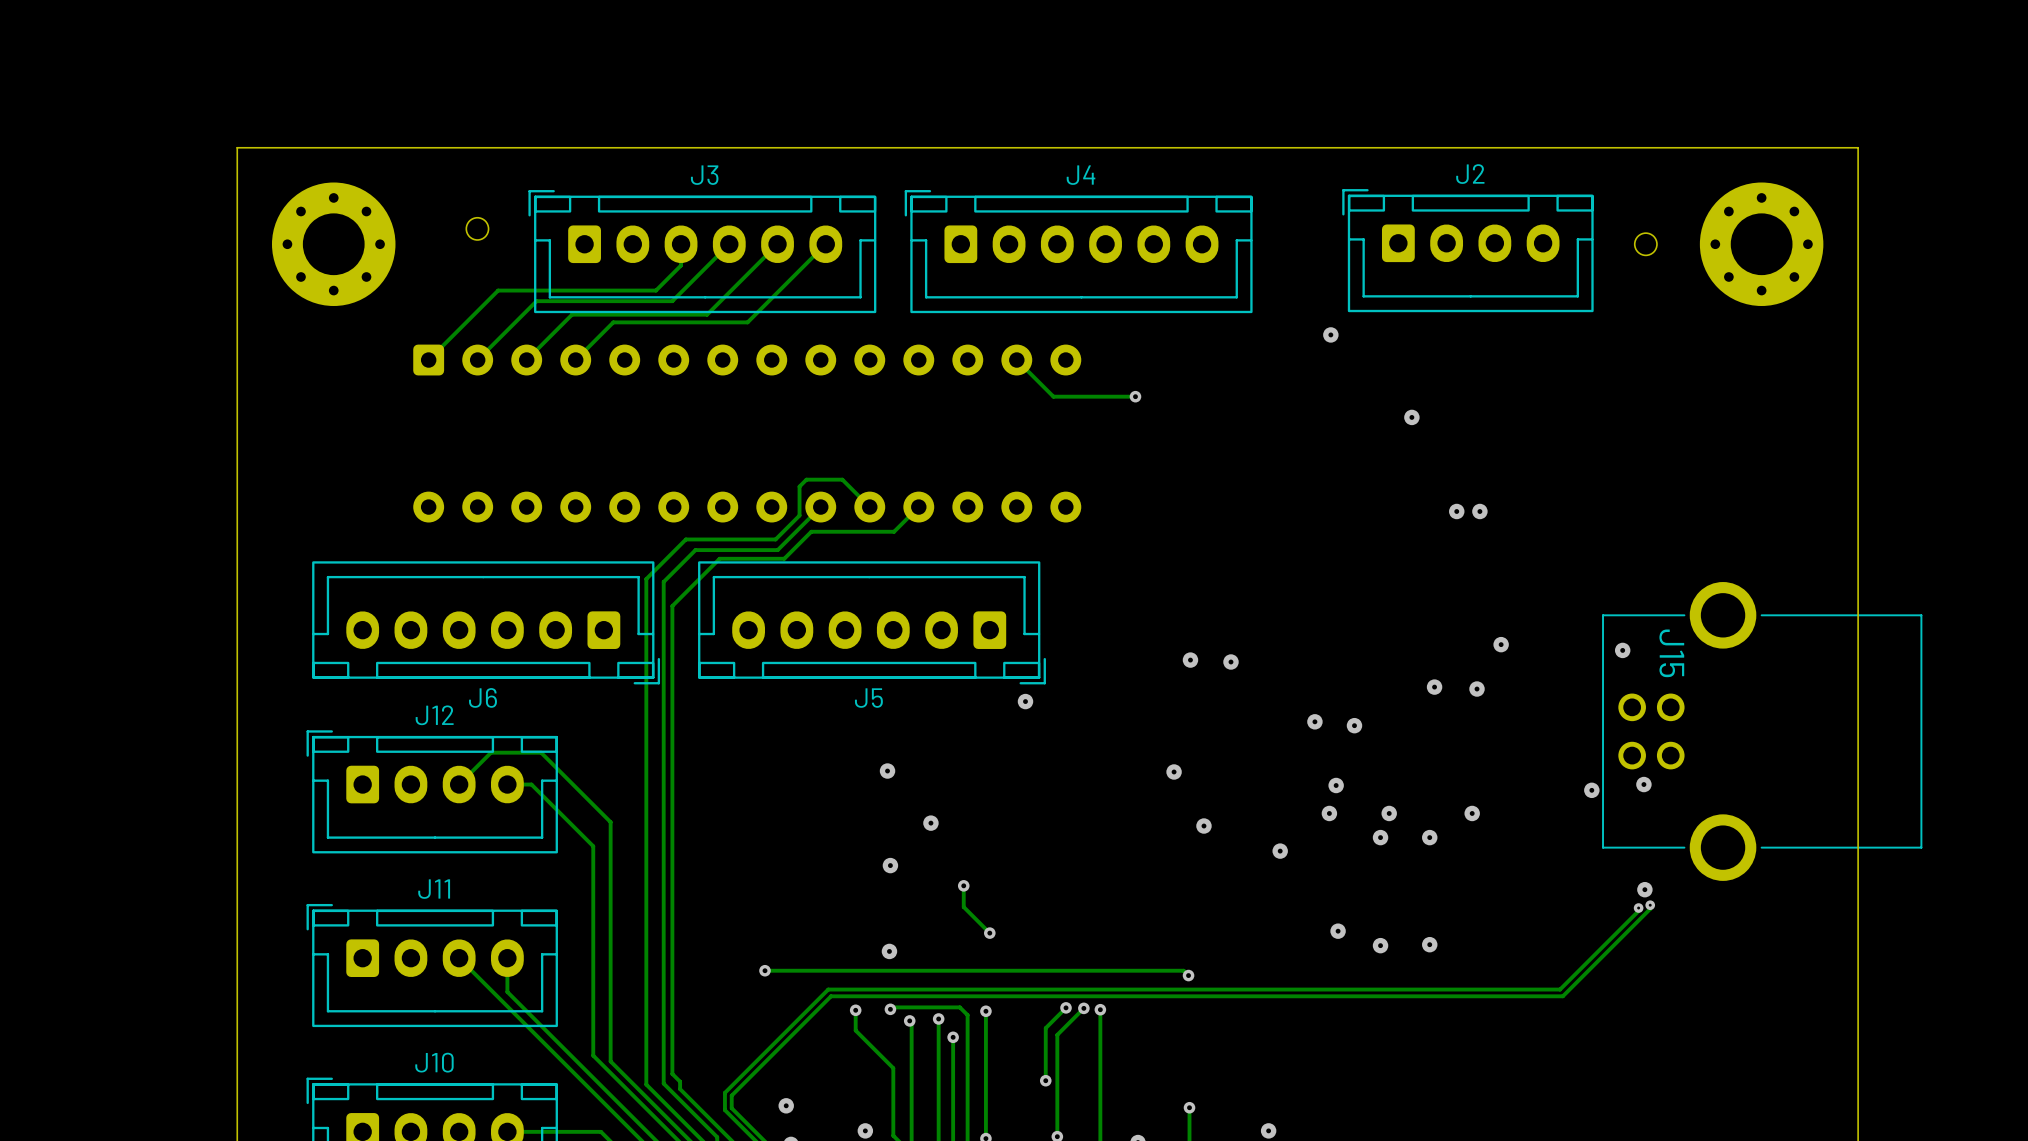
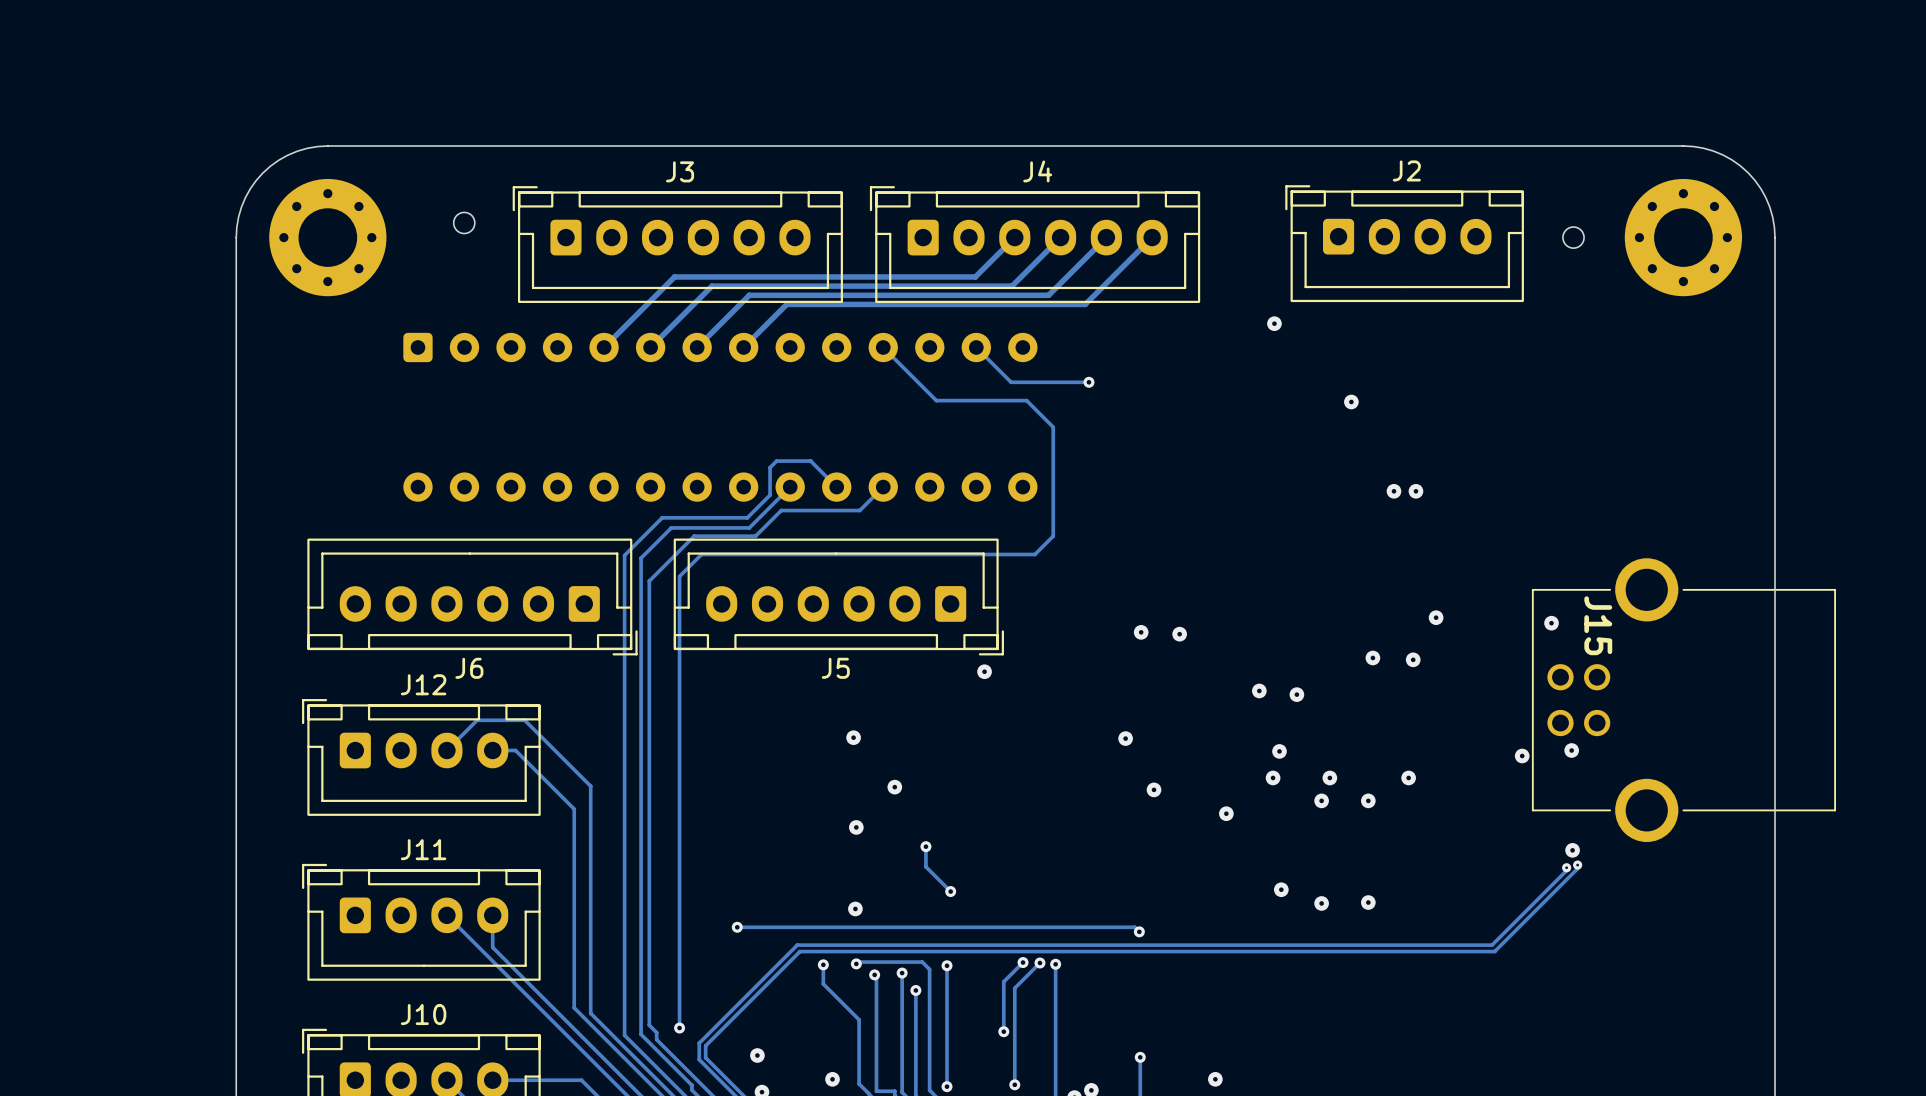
board edge: (333, 147) (237, 147) (237, 244) -> (327, 145) (297, 151) (279, 160) (263, 172) (245, 197) (238, 217) (236, 237)
board edge: (1761, 147) (1858, 147) (1858, 244) -> (1683, 145) (1703, 148) (1723, 155) (1748, 172) (1765, 197) (1772, 217) (1775, 237)
track: (681, 244) (681, 265) (655, 290) (498, 290) (428, 360) -> none
track: (729, 244) (672, 301) (536, 301) (477, 360) -> none
track: (777, 244) (707, 314) (572, 314) (526, 360) -> none
track: (825, 244) (747, 322) (613, 322) (575, 360) -> none
track: none -> (1014, 237) (975, 276) (674, 276) (604, 347)
track: none -> (1060, 237) (1012, 286) (711, 286) (650, 347)
track: none -> (1106, 237) (1048, 295) (749, 295) (697, 347)
track: none -> (1152, 237) (1085, 304) (786, 304) (743, 347)
track: none -> (883, 347) (936, 400) (1026, 400) (1053, 427) (1053, 536) (1034, 554) (701, 554) (679, 576) (679, 1028)
via: none -> (679, 1028)

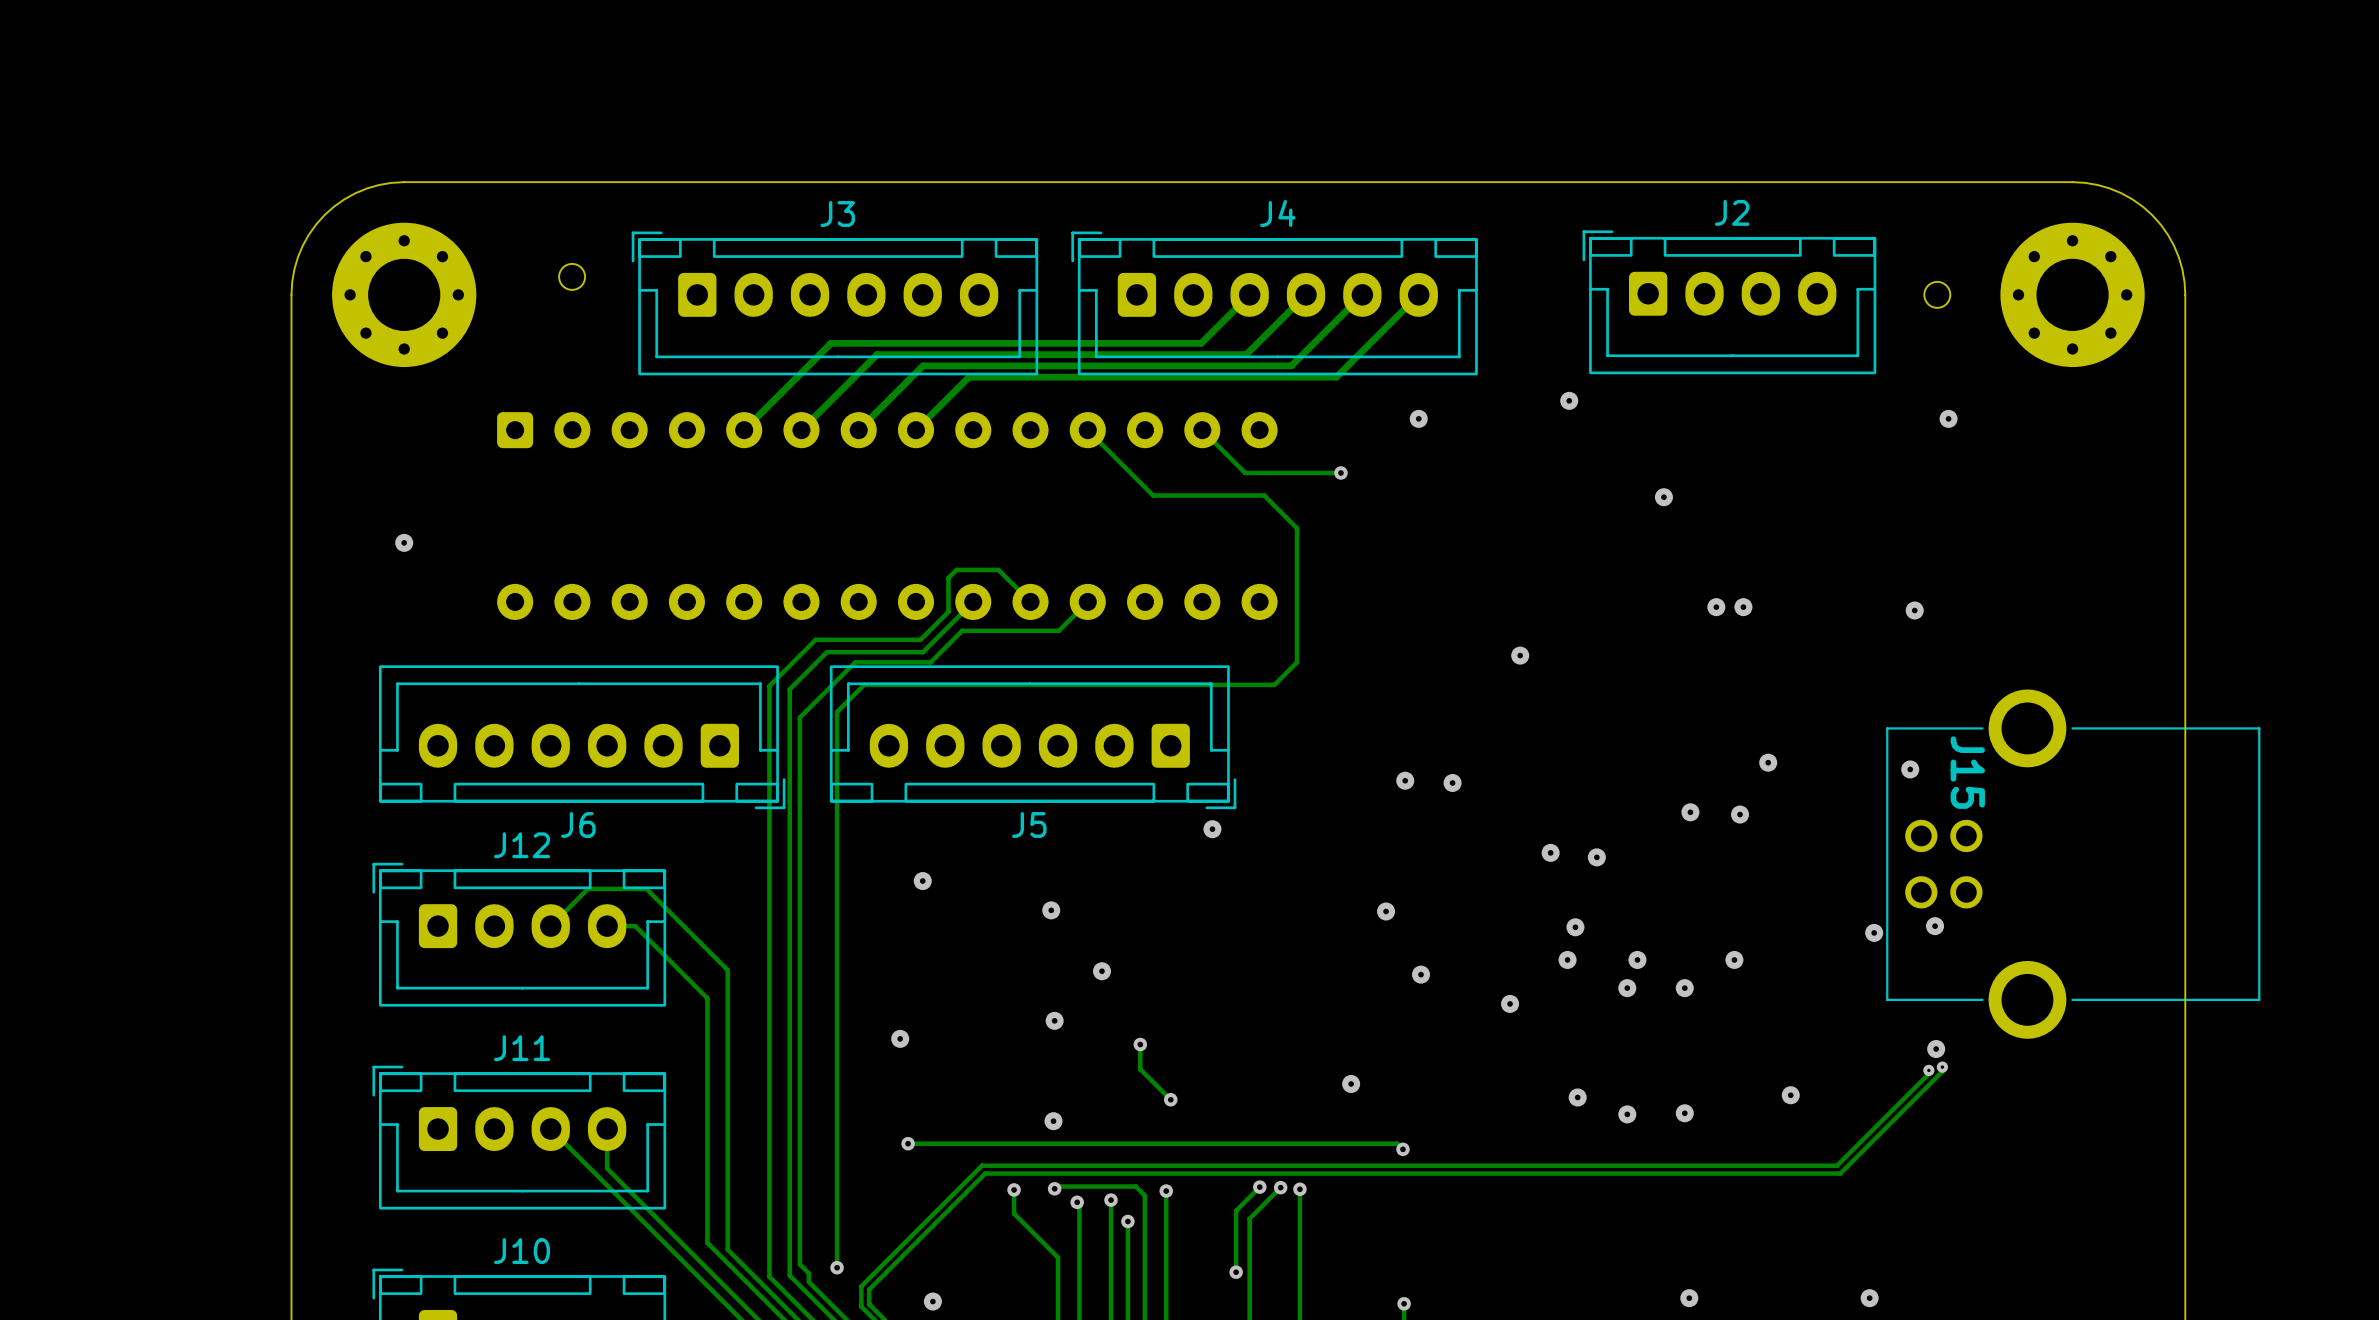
via: none -> (1418, 418)
via: none -> (1948, 418)
via: none -> (404, 542)
via: none -> (1914, 610)
via: none -> (1520, 655)
via: none -> (922, 881)
via: none -> (900, 1038)
via: none -> (1351, 1083)
via: none -> (1790, 1095)
via: none -> (1689, 1298)
via: none -> (1869, 1298)

